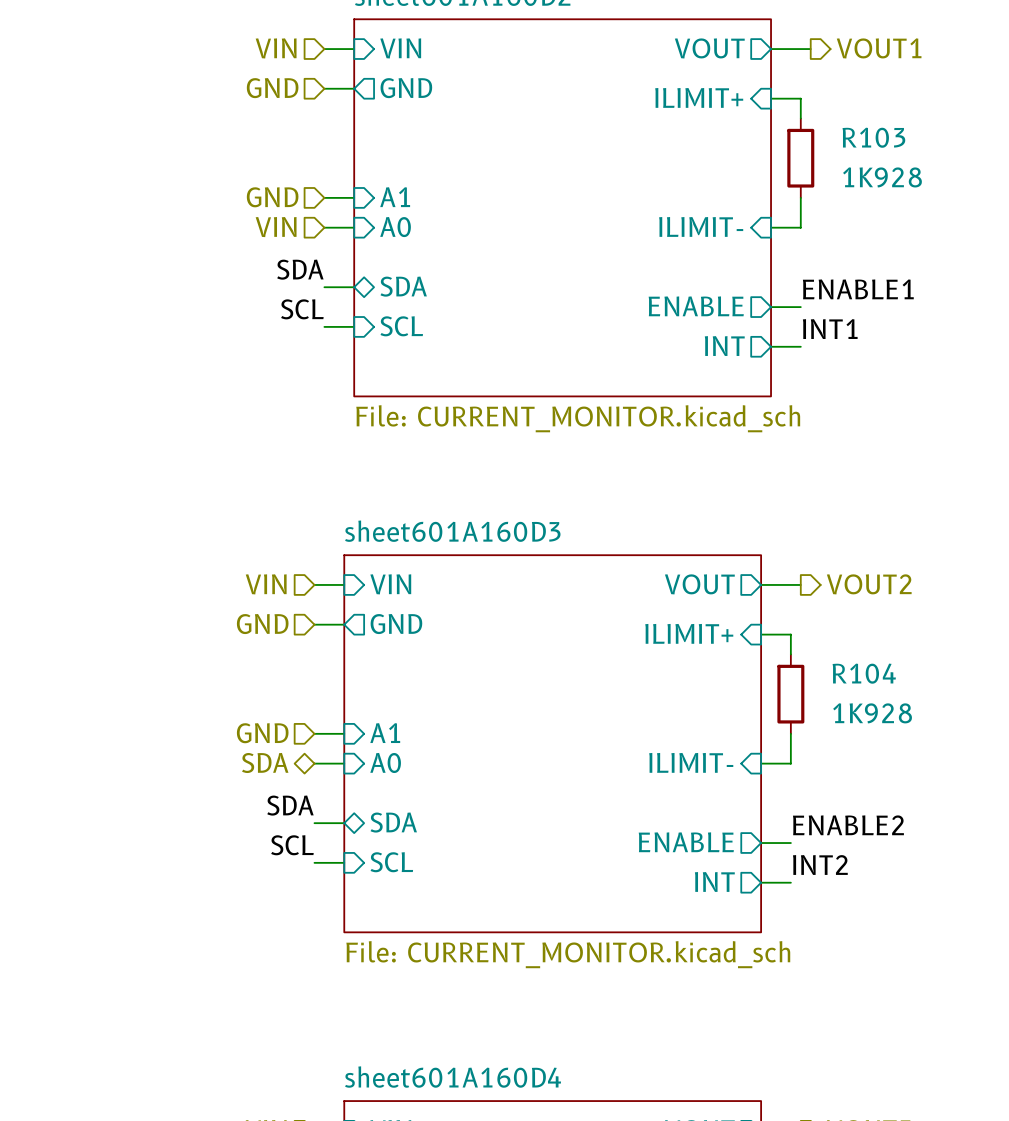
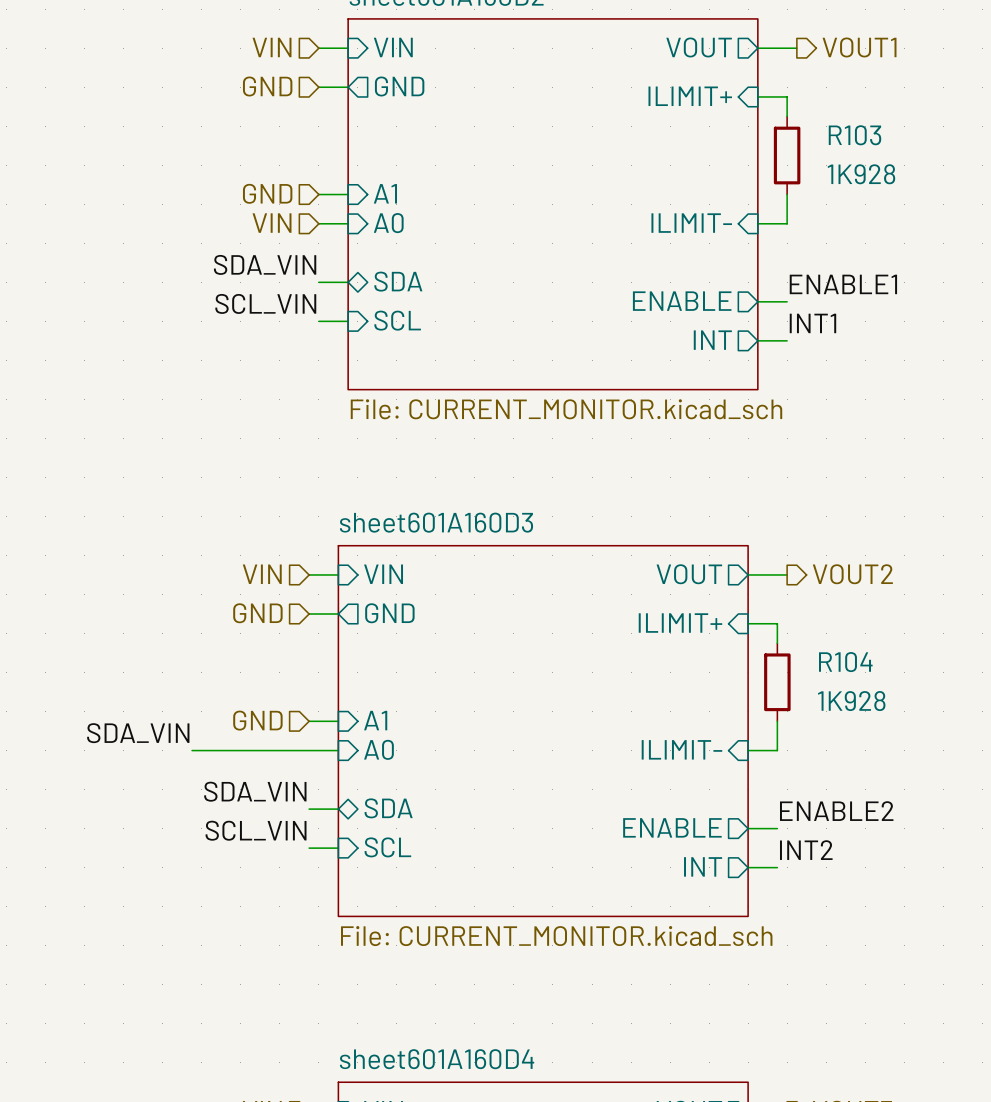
label: SDA (300, 269) -> SDA_VIN (265, 264)
label: SCL (302, 309) -> SCL_VIN (265, 303)
label: none -> SDA_VIN (138, 733)
hierarchical label: SDA (265, 762) -> none
wire: none -> (192, 750) (309, 750)
label: SDA (290, 805) -> SDA_VIN (255, 791)
label: SCL (292, 845) -> SCL_VIN (256, 830)

